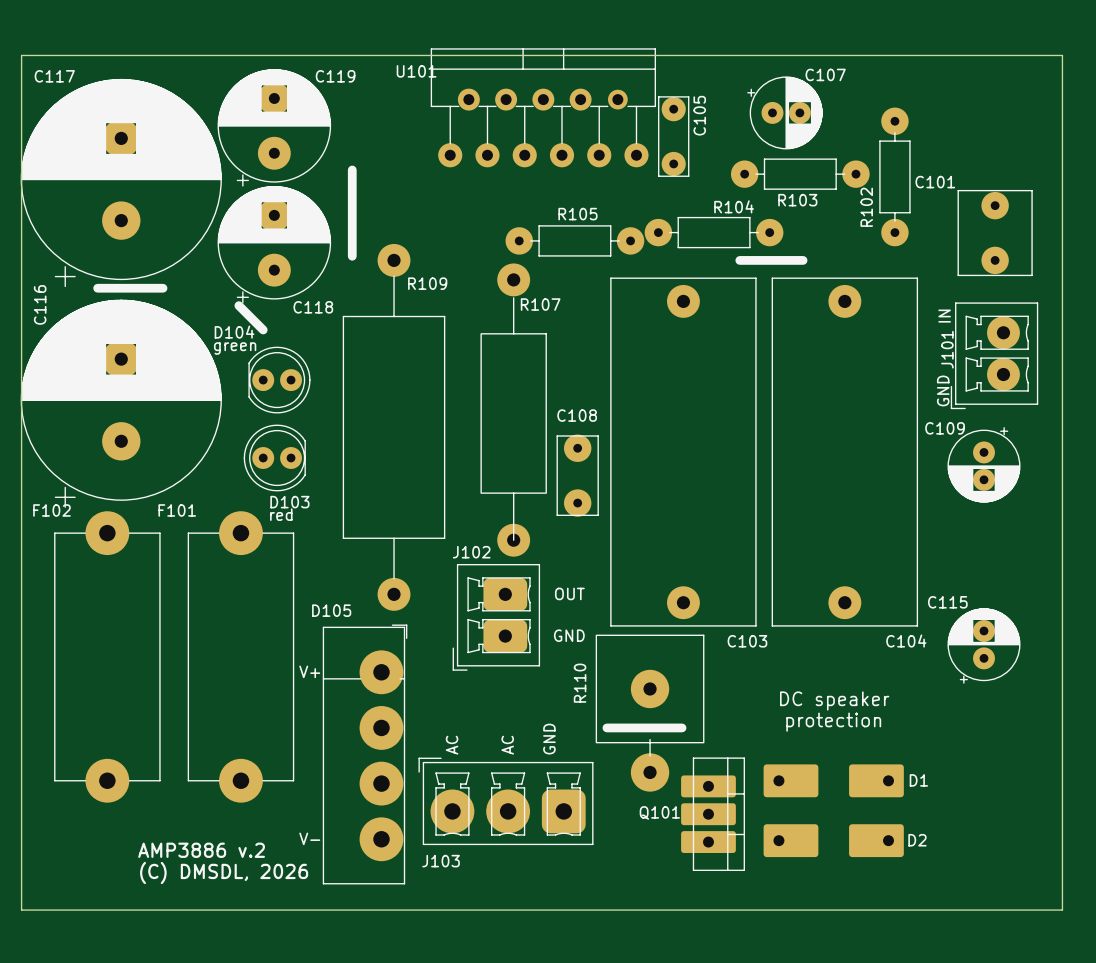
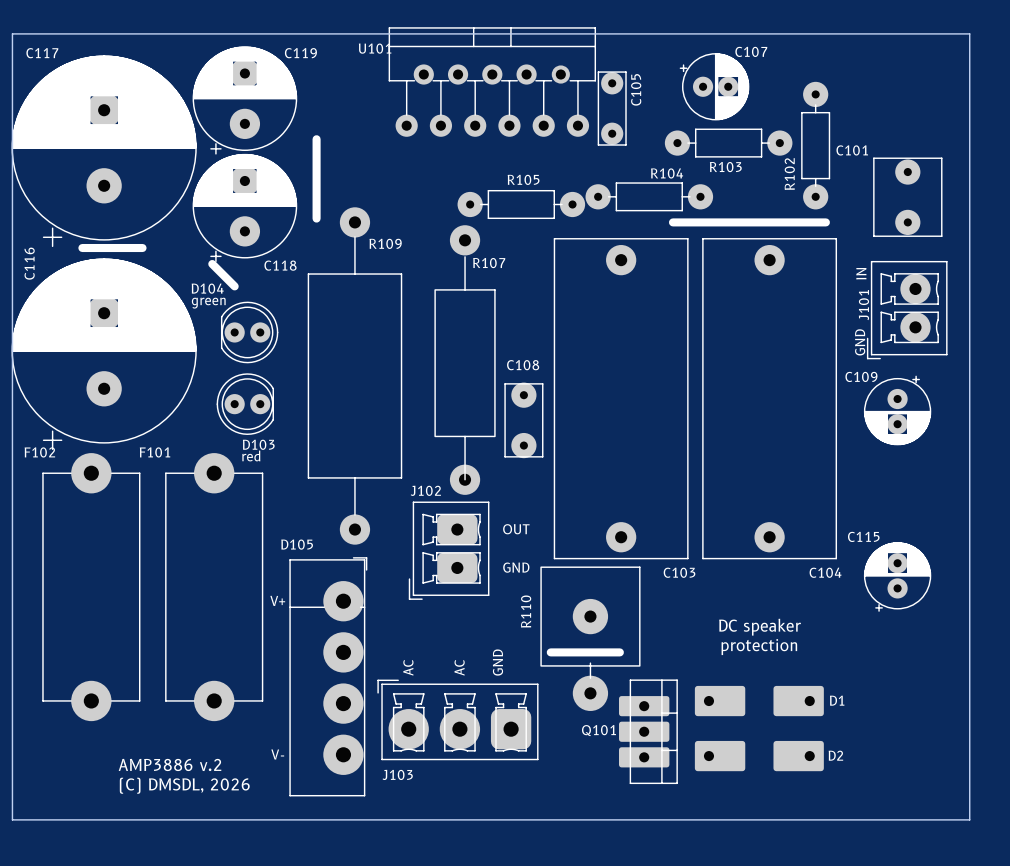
line: none -> (731, 222) (825, 222)

